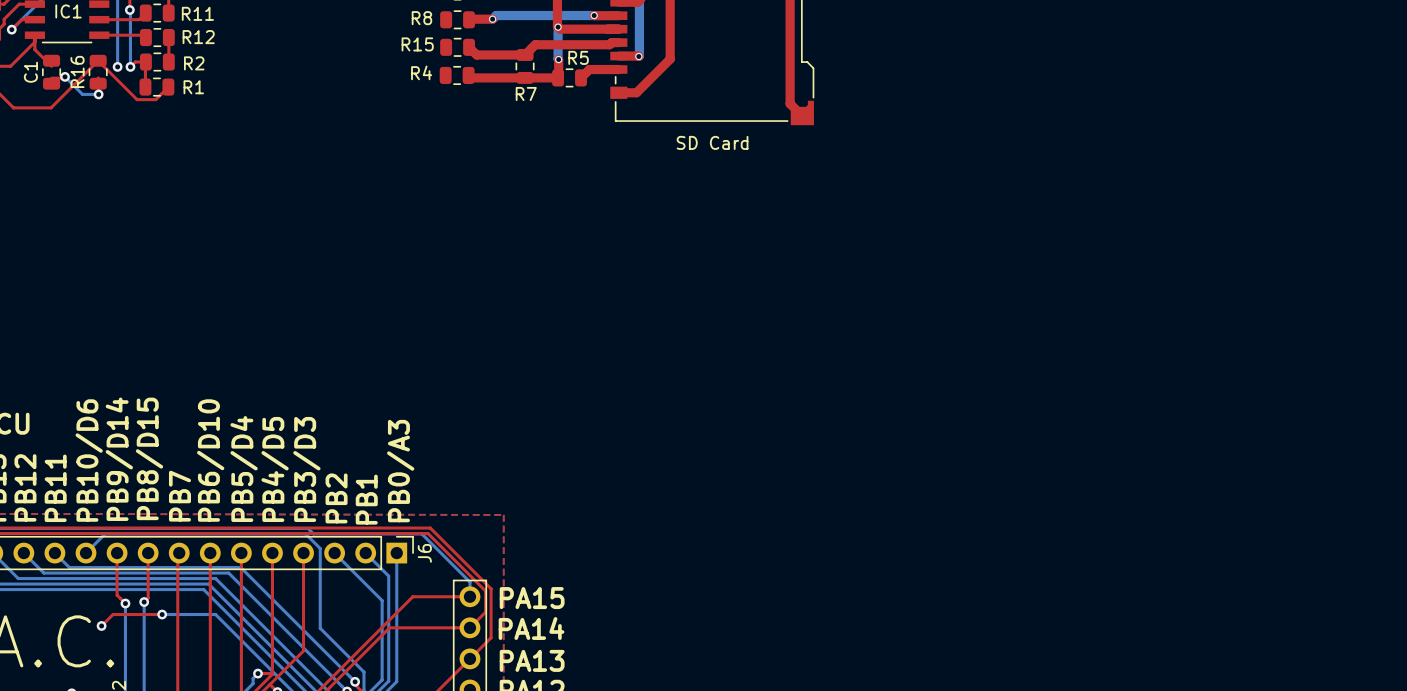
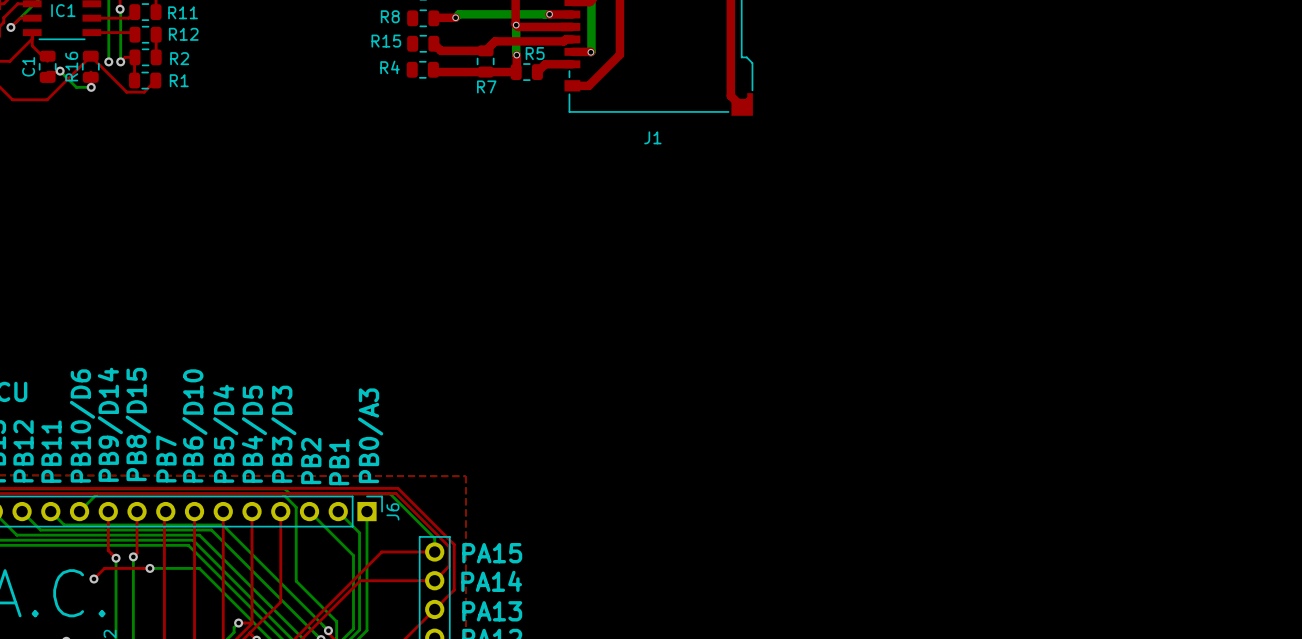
SD Card name: SD Card (712, 142) -> J1 (652, 137)

